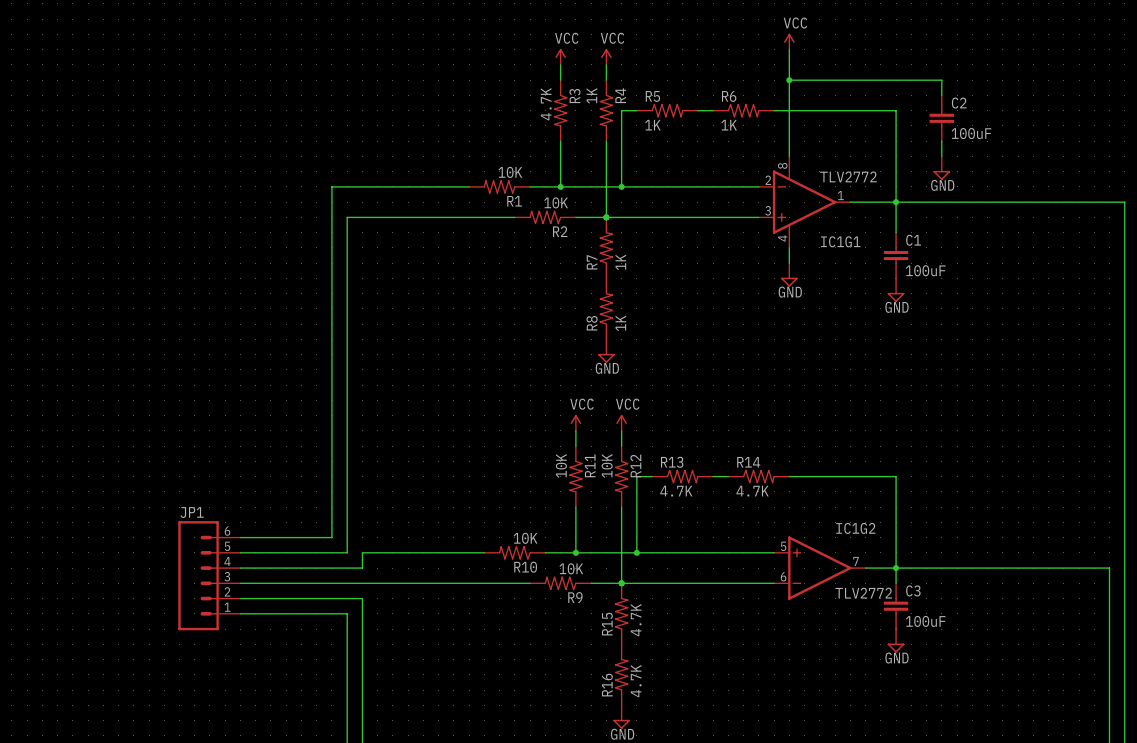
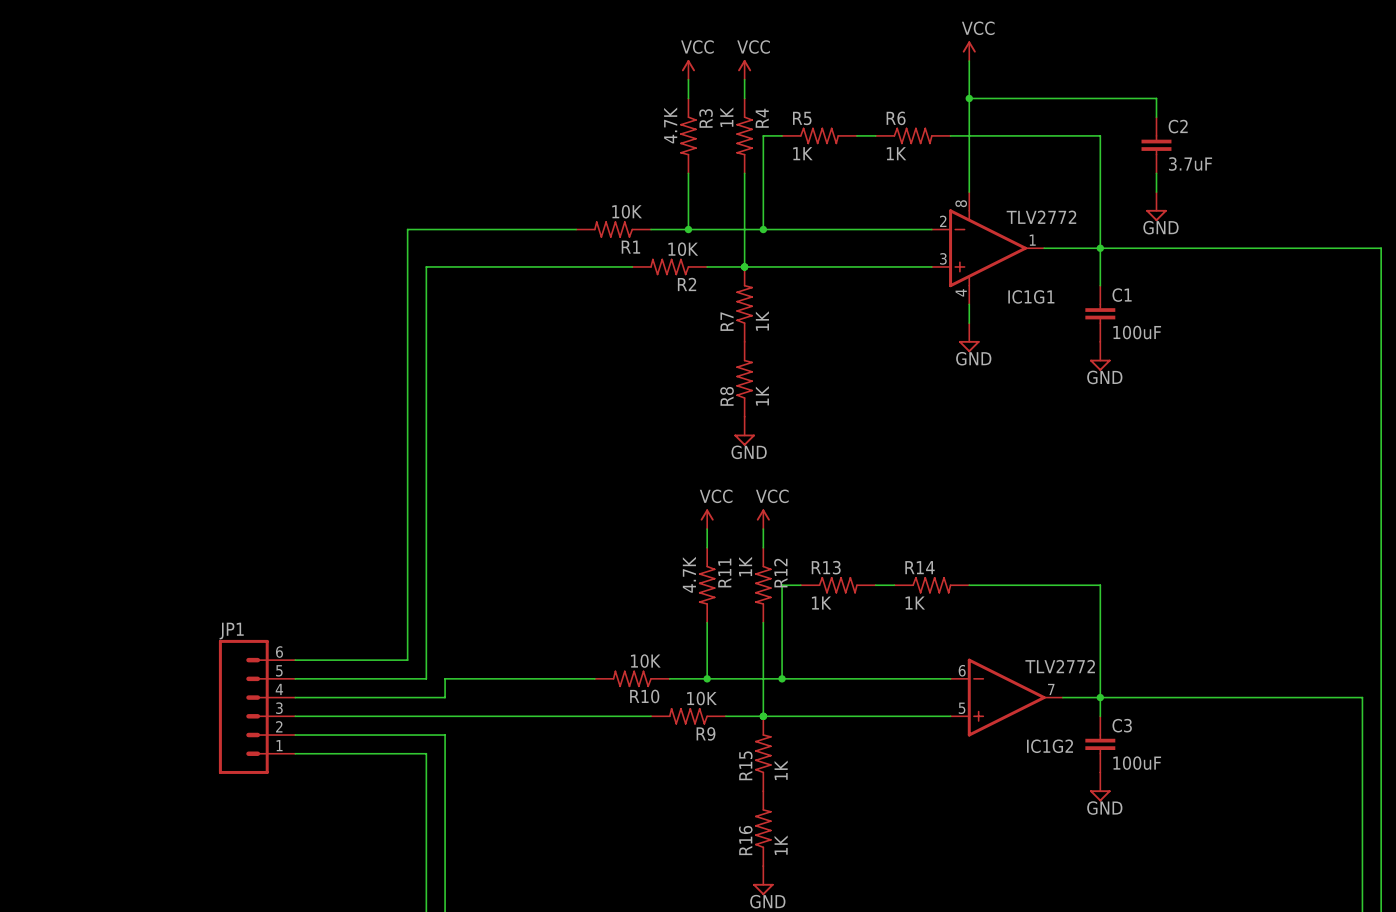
C2 value: 100uF (971, 133) -> 3.7uF (1190, 164)
R11 value: 10K (561, 465) -> 4.7K (689, 574)
R12 value: 10K (607, 465) -> 1K (745, 566)
R13 value: 4.7K (676, 491) -> 1K (821, 603)
R14 value: 4.7K (752, 491) -> 1K (915, 603)
IC1G2 flip: as is (819, 568) -> up-down (1006, 697)
R15 value: 4.7K (636, 620) -> 1K (781, 770)
R16 value: 4.7K (636, 681) -> 1K (781, 845)

